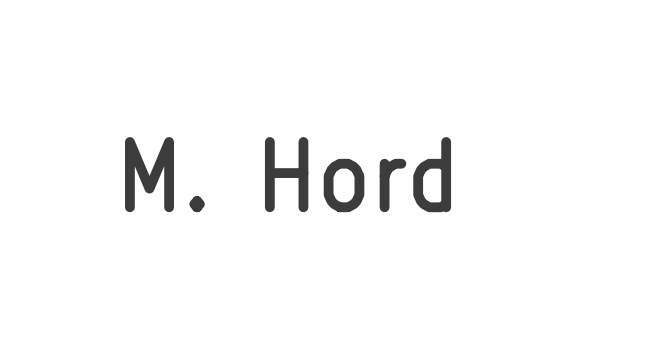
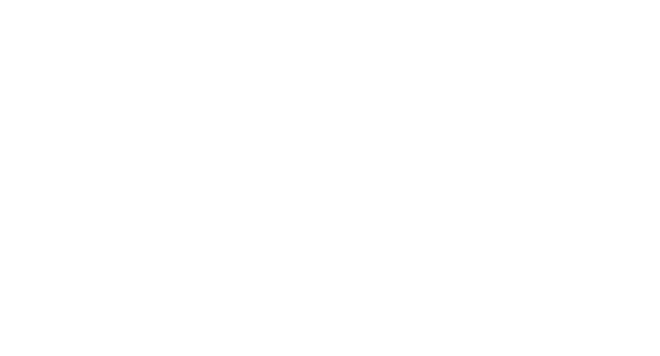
text: M. Hord (288, 174) -> none

